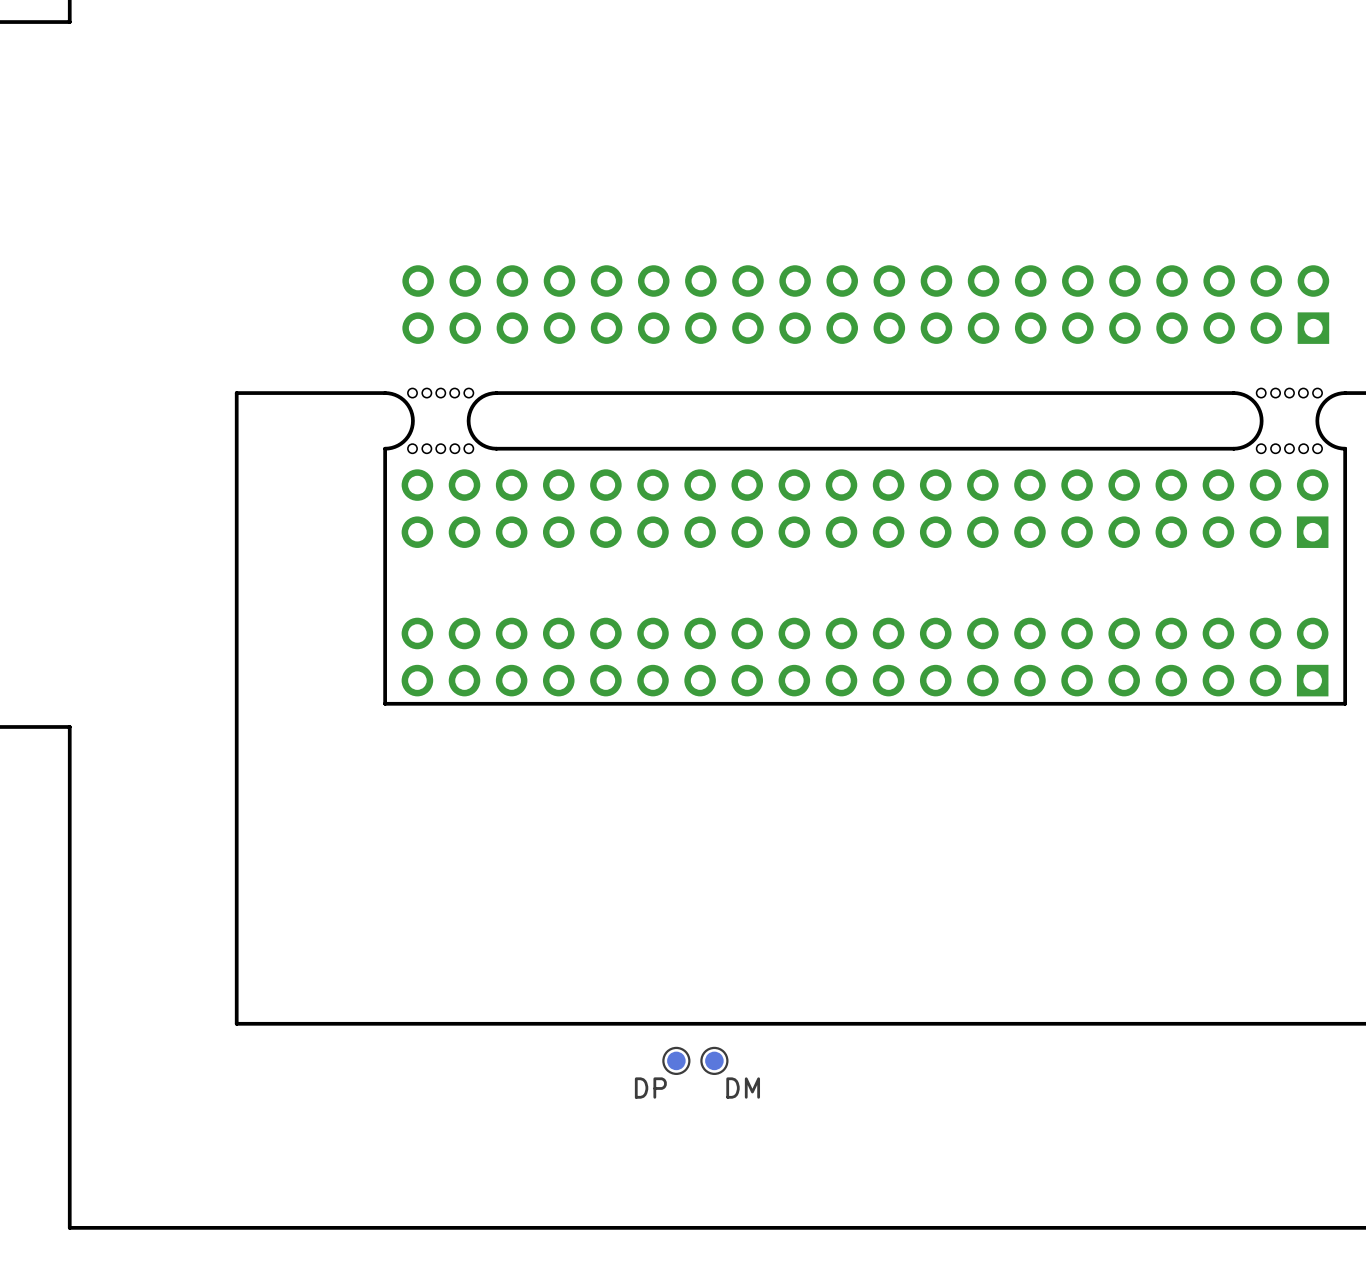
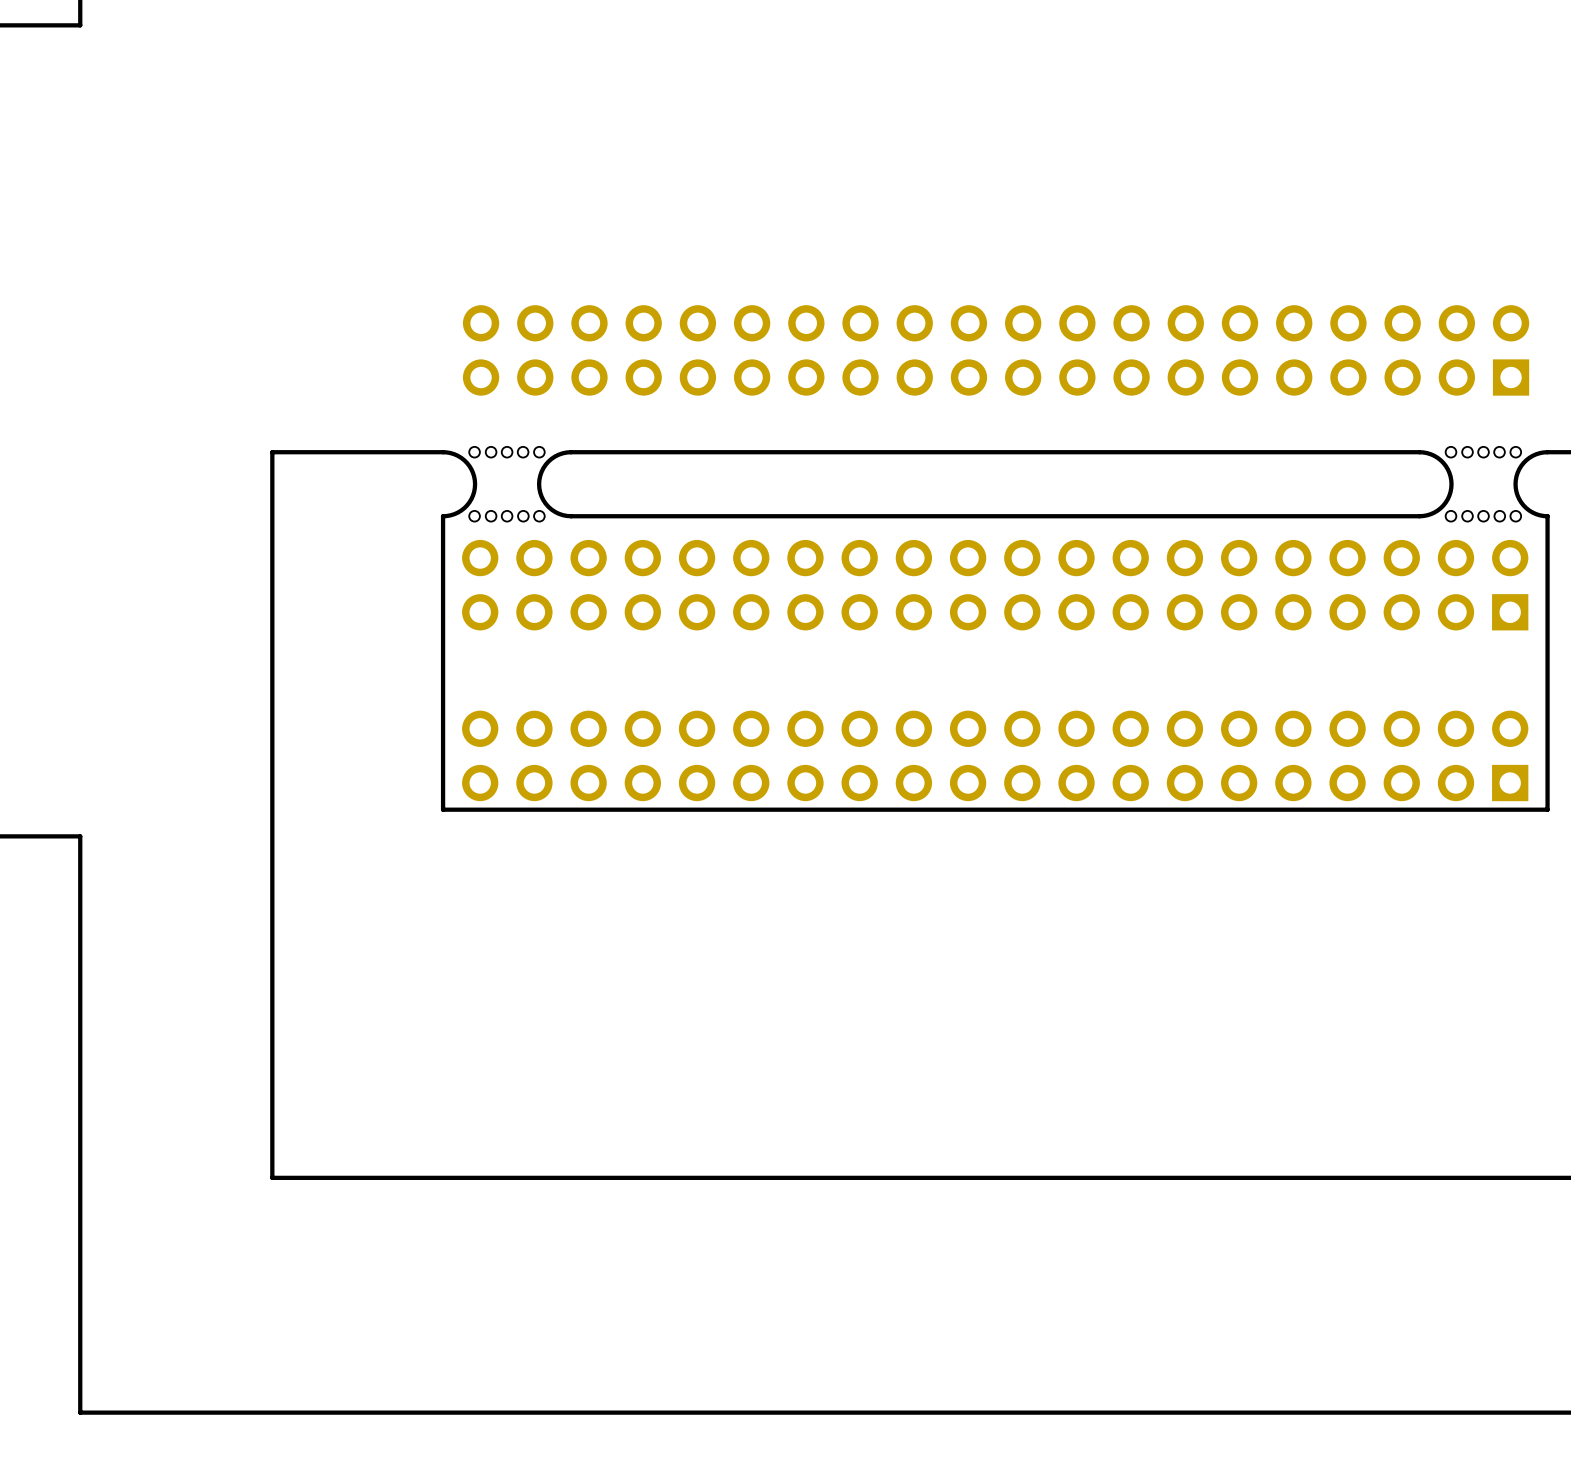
part: DP (676, 1060) -> none
part: DM (714, 1060) -> none

